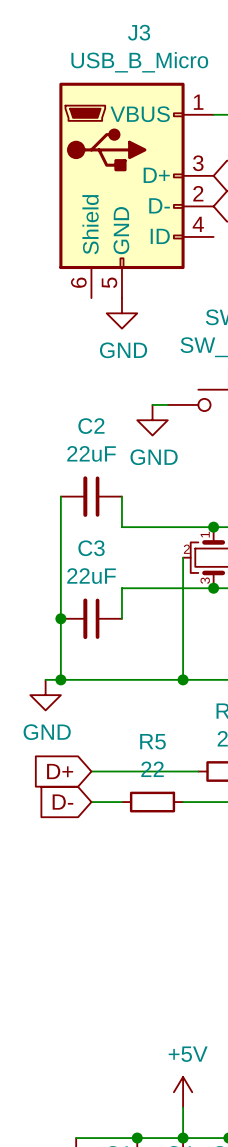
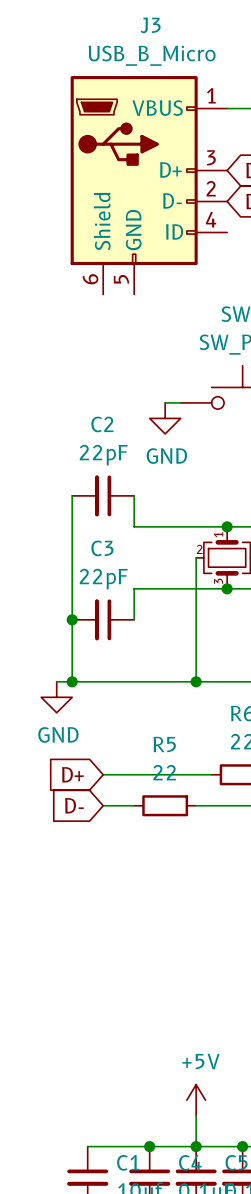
power symbol: GND (121, 313) -> none
C2 value: 22uF (91, 453) -> 22pF (103, 455)
C3 value: 22uF (91, 576) -> 22pF (103, 579)

